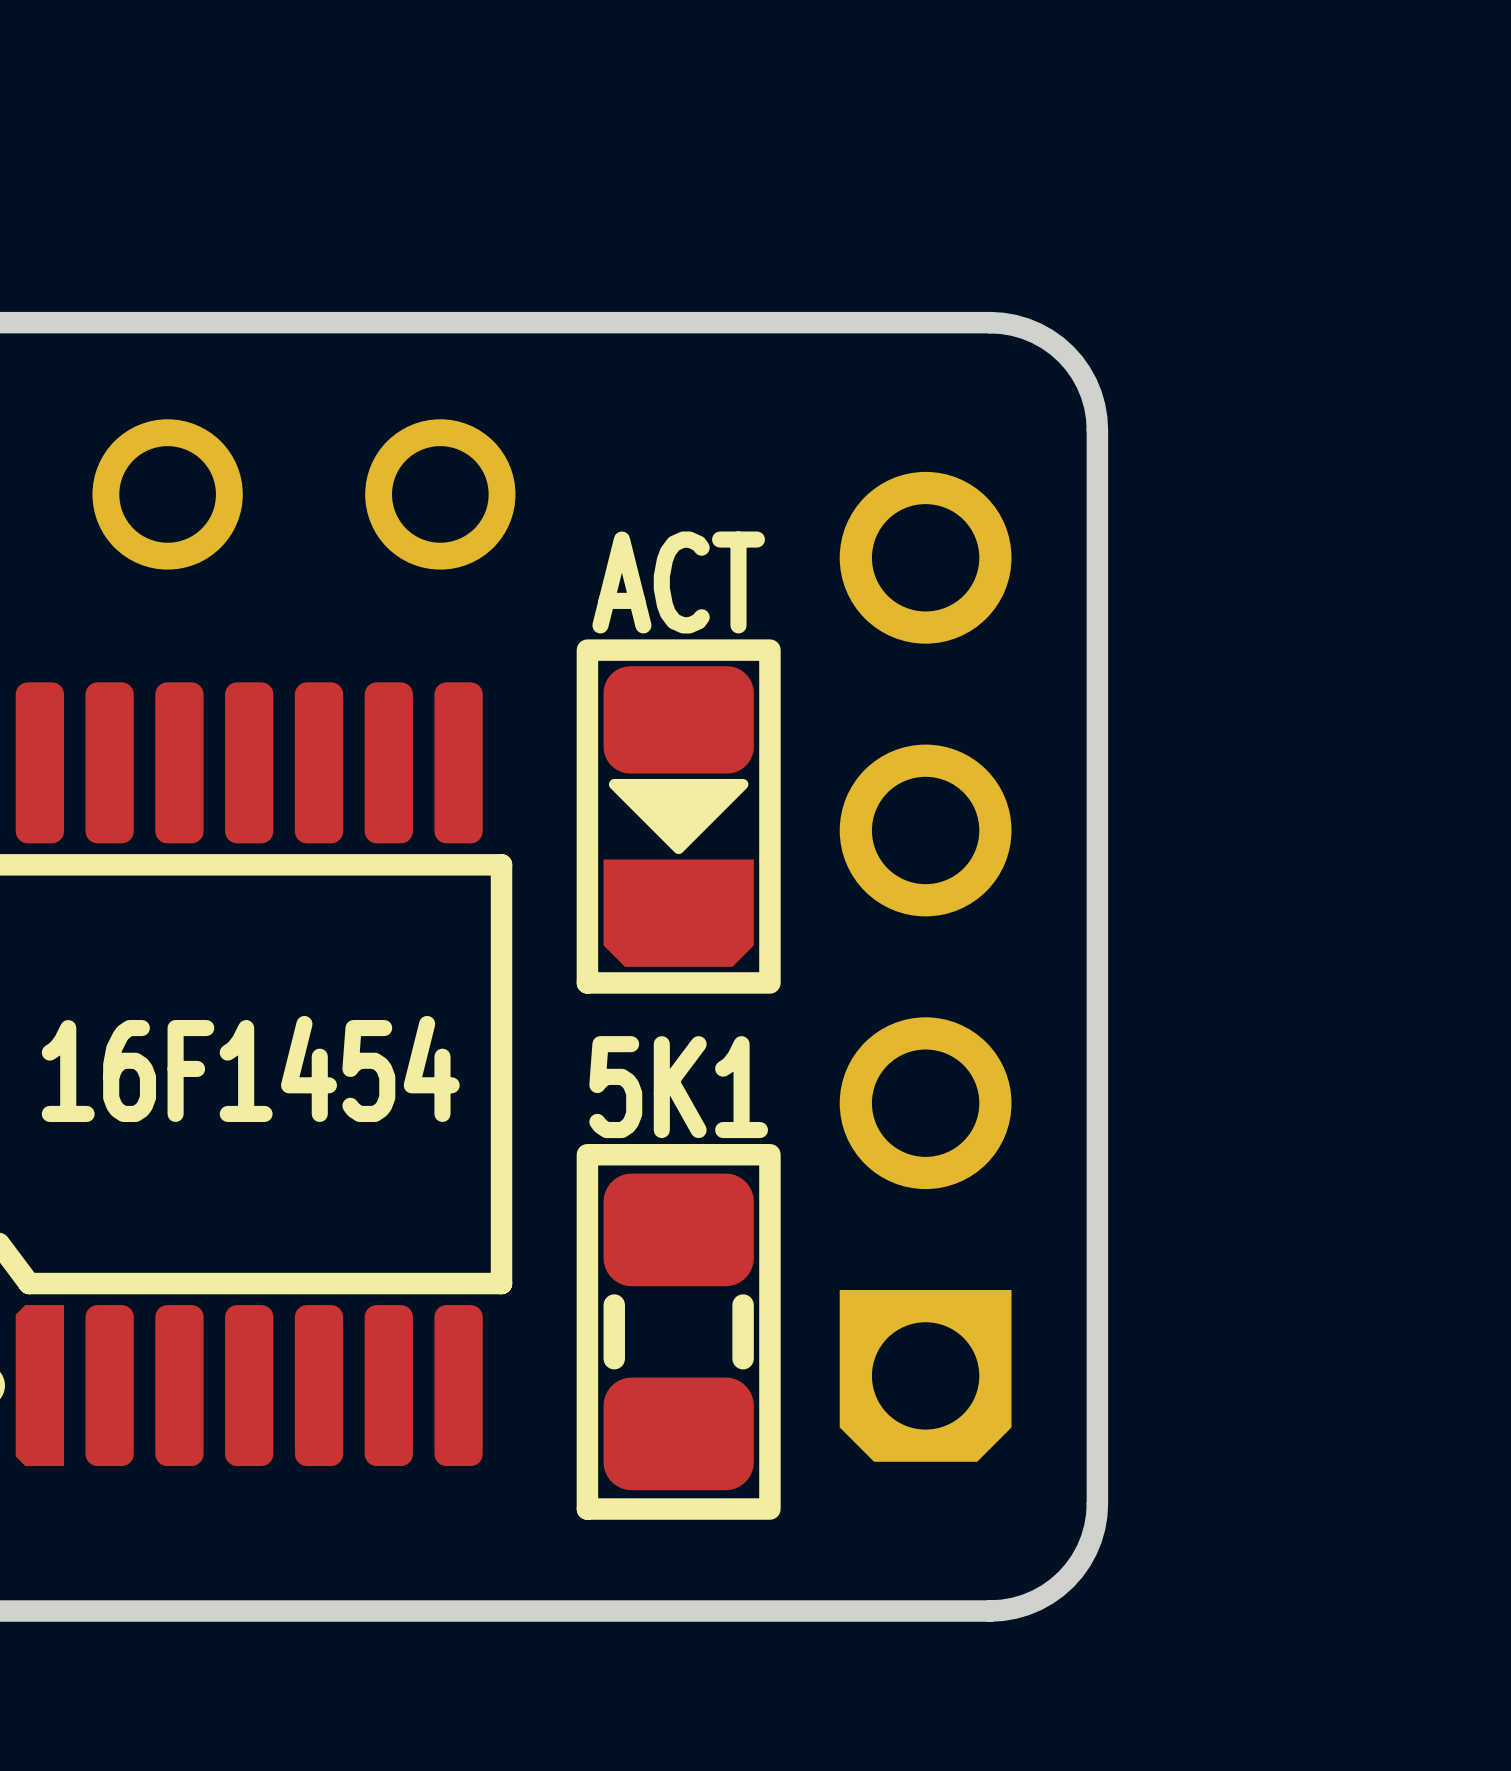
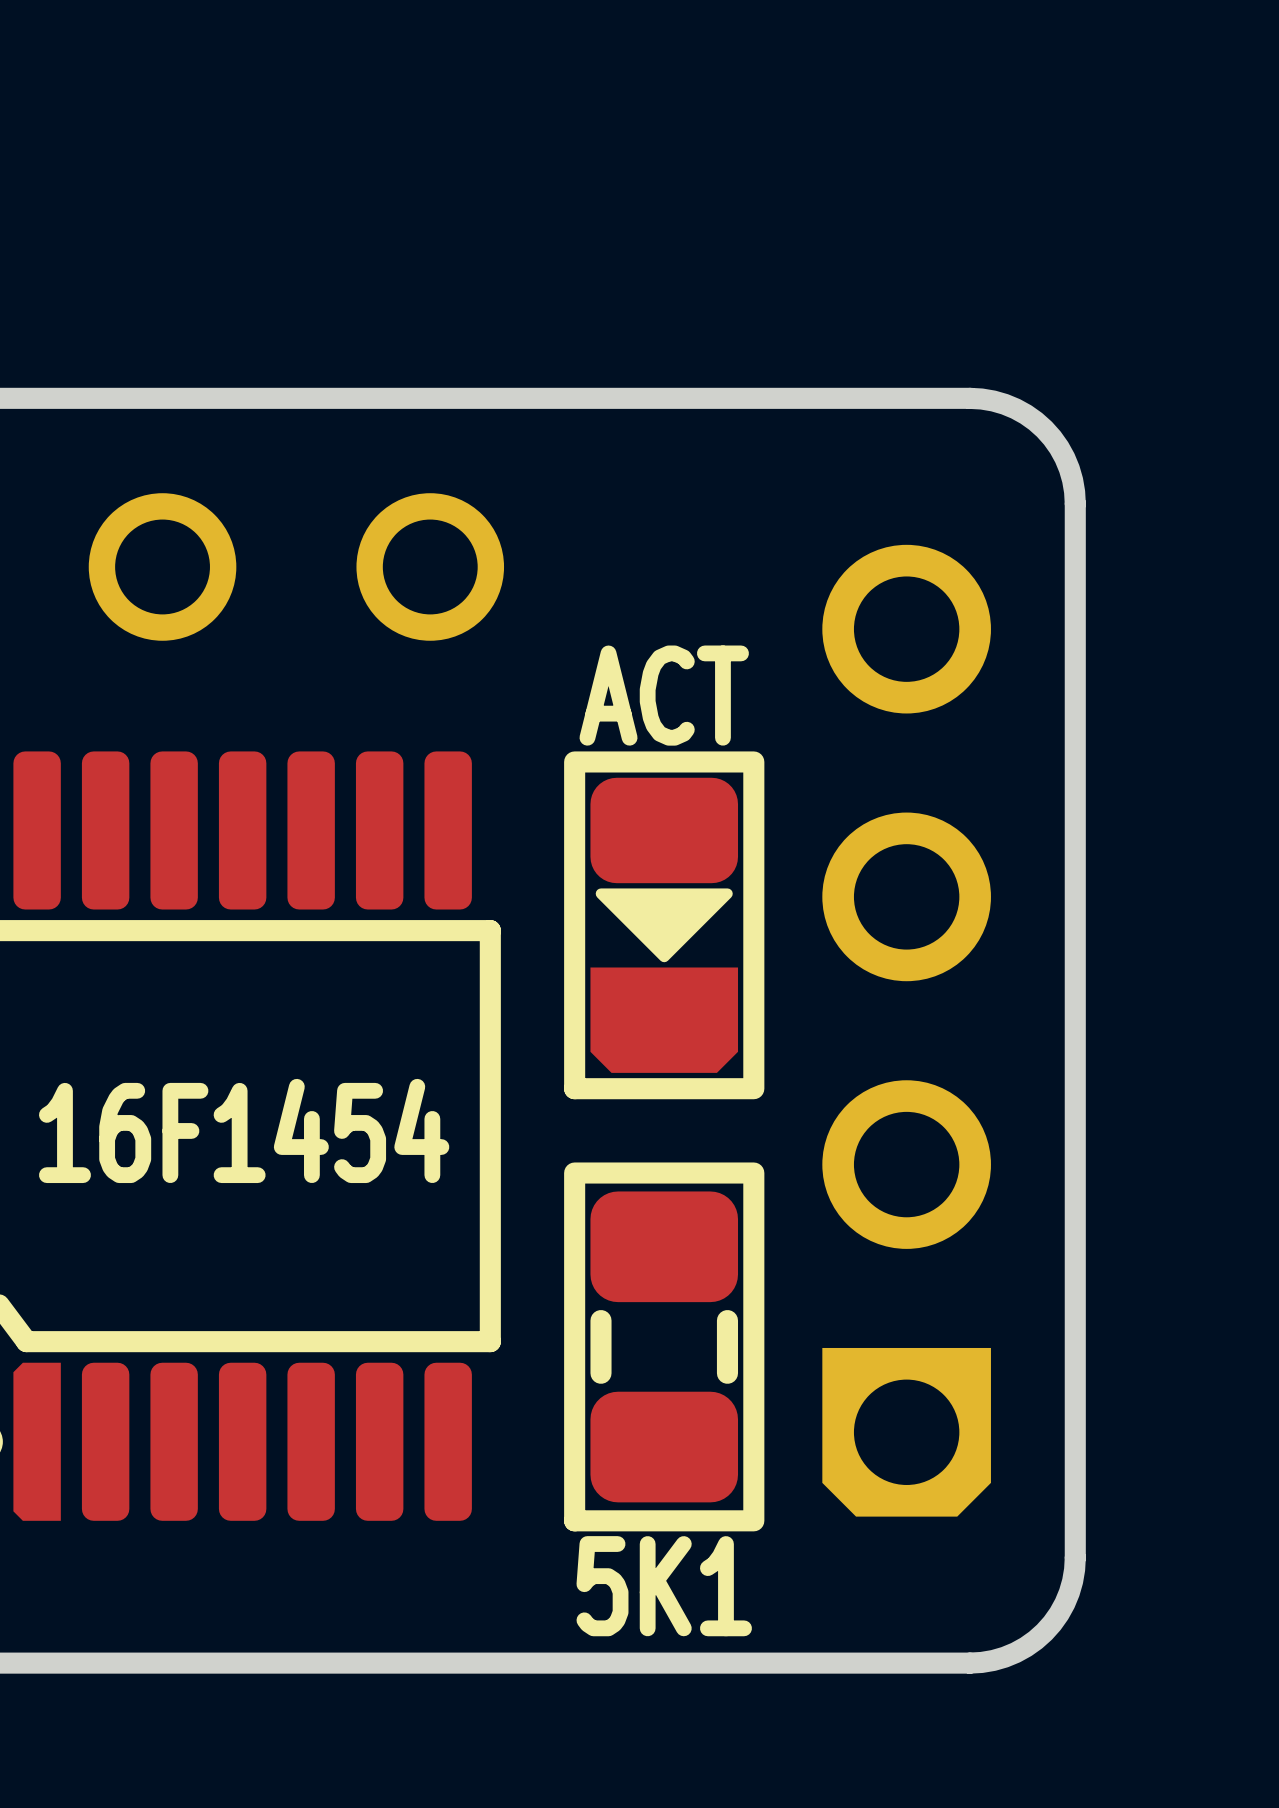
part position: (678, 816) -> (664, 925)
part value position: 5K1 (678, 1087) -> 5K1 (664, 1586)
part position: (678, 1331) -> (664, 1346)

